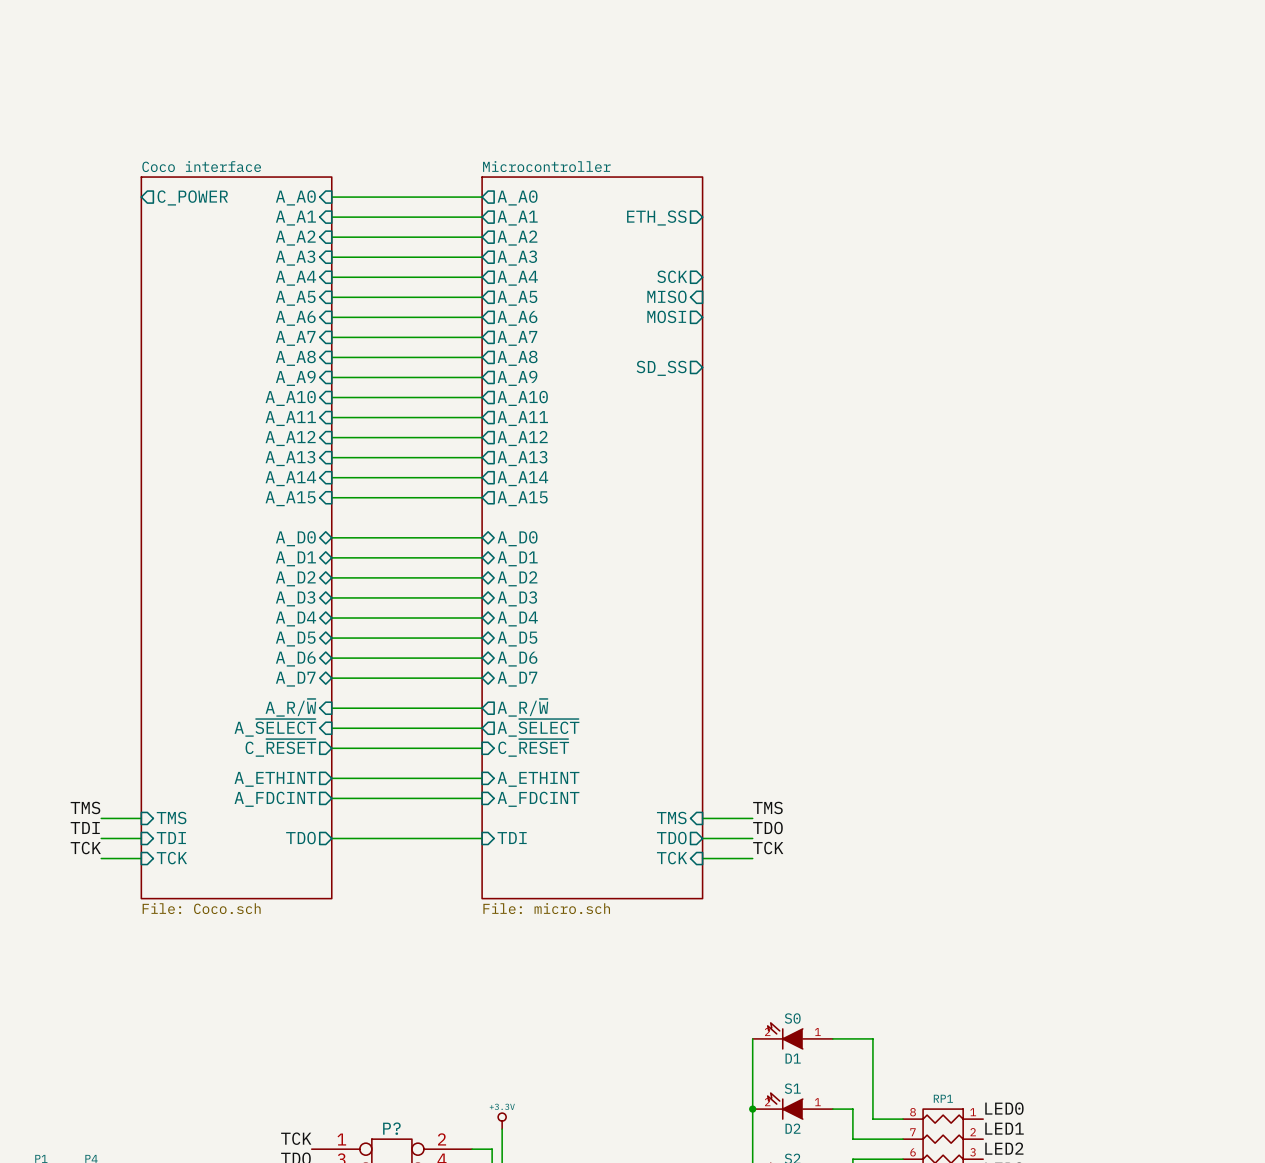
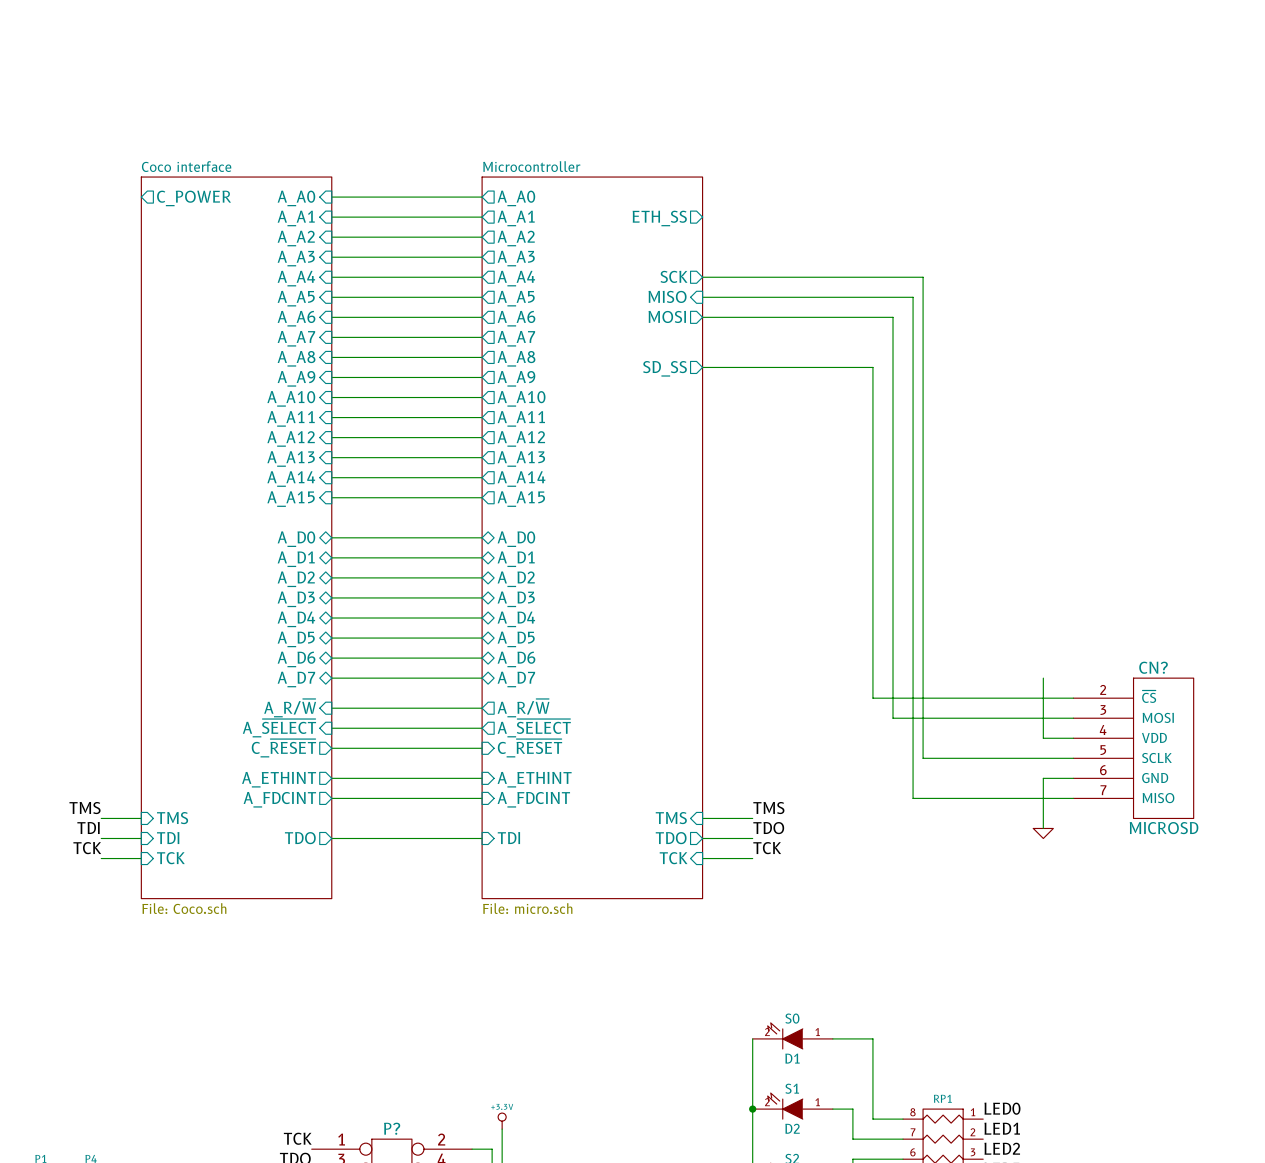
wire: none -> (702, 277) (923, 277) (923, 758) (1073, 758)
wire: none -> (702, 297) (913, 297) (913, 798) (1073, 798)
wire: none -> (702, 317) (893, 317) (893, 718) (1073, 718)
wire: none -> (702, 367) (872, 367) (872, 698) (1073, 698)
wire: none -> (1043, 678) (1043, 738) (1073, 738)
CN?: none -> MICROSD (1133, 748)
wire: none -> (1073, 778) (1043, 778) (1043, 828)
power symbol: none -> (1043, 833)

